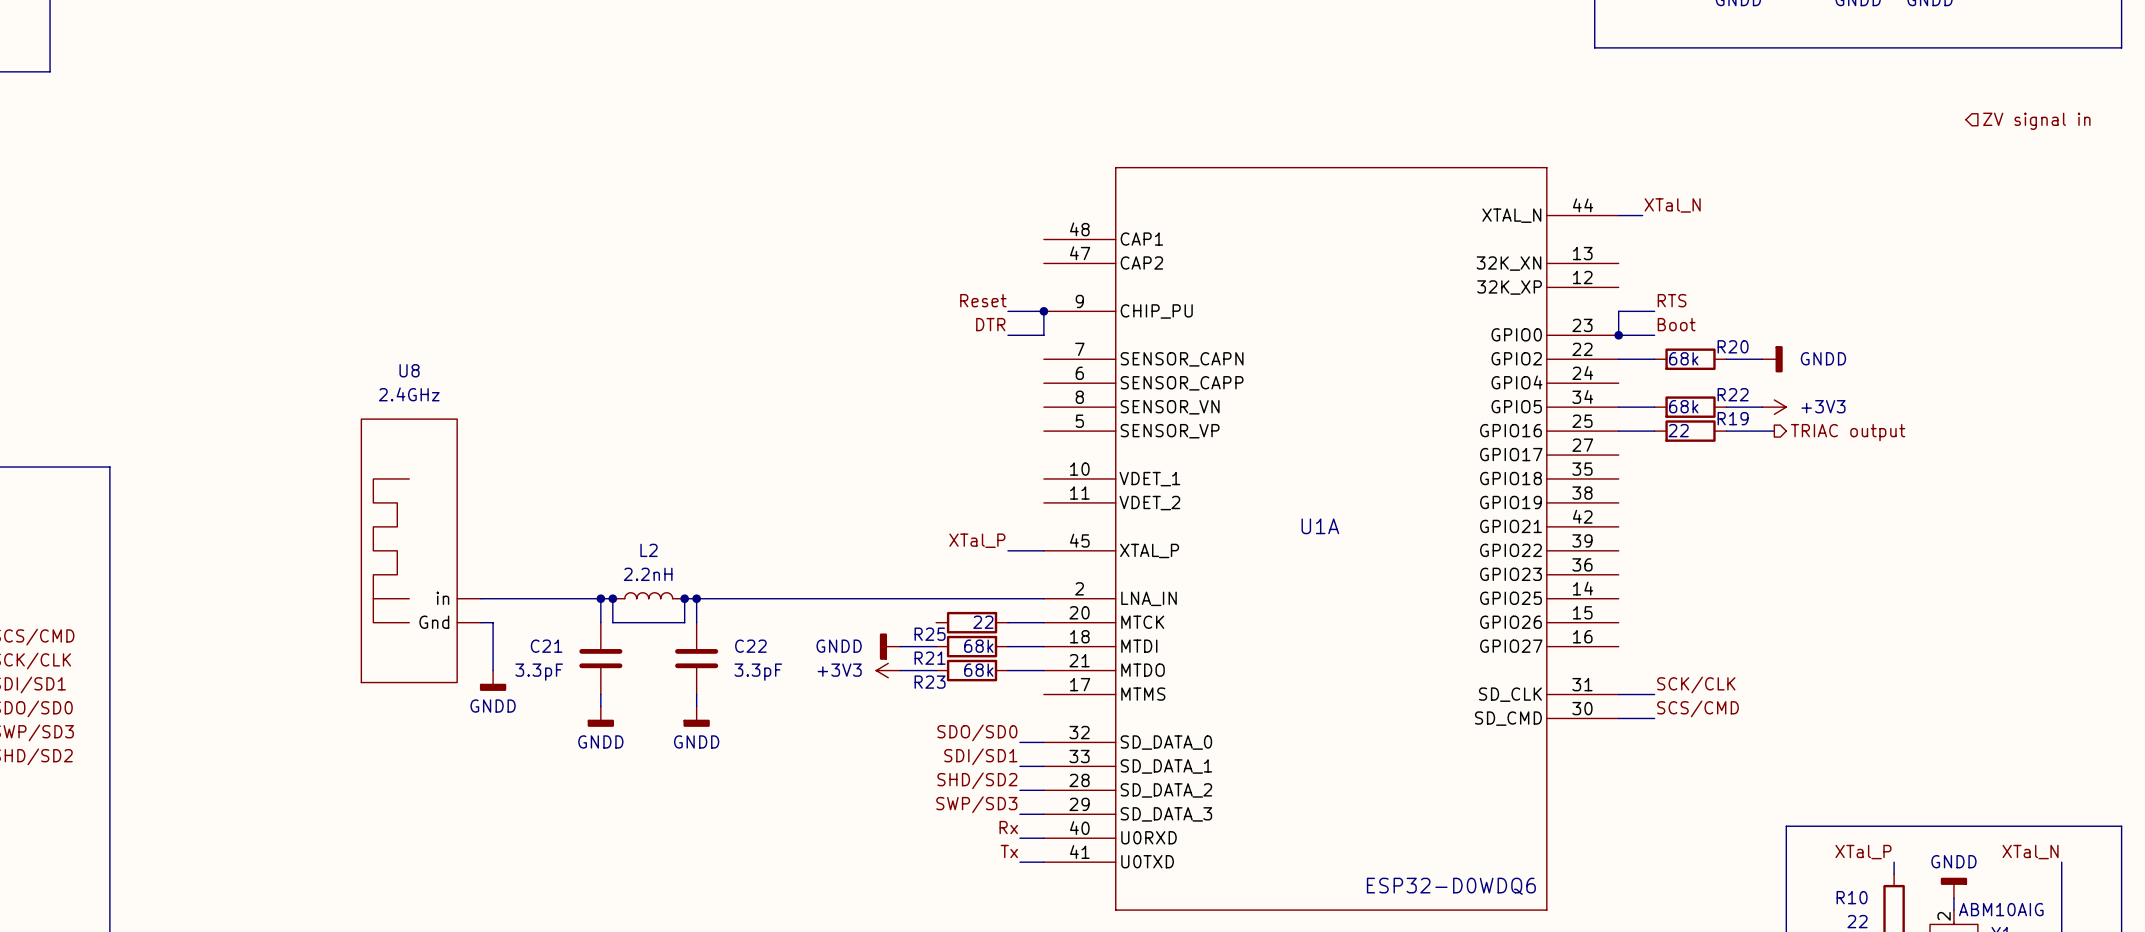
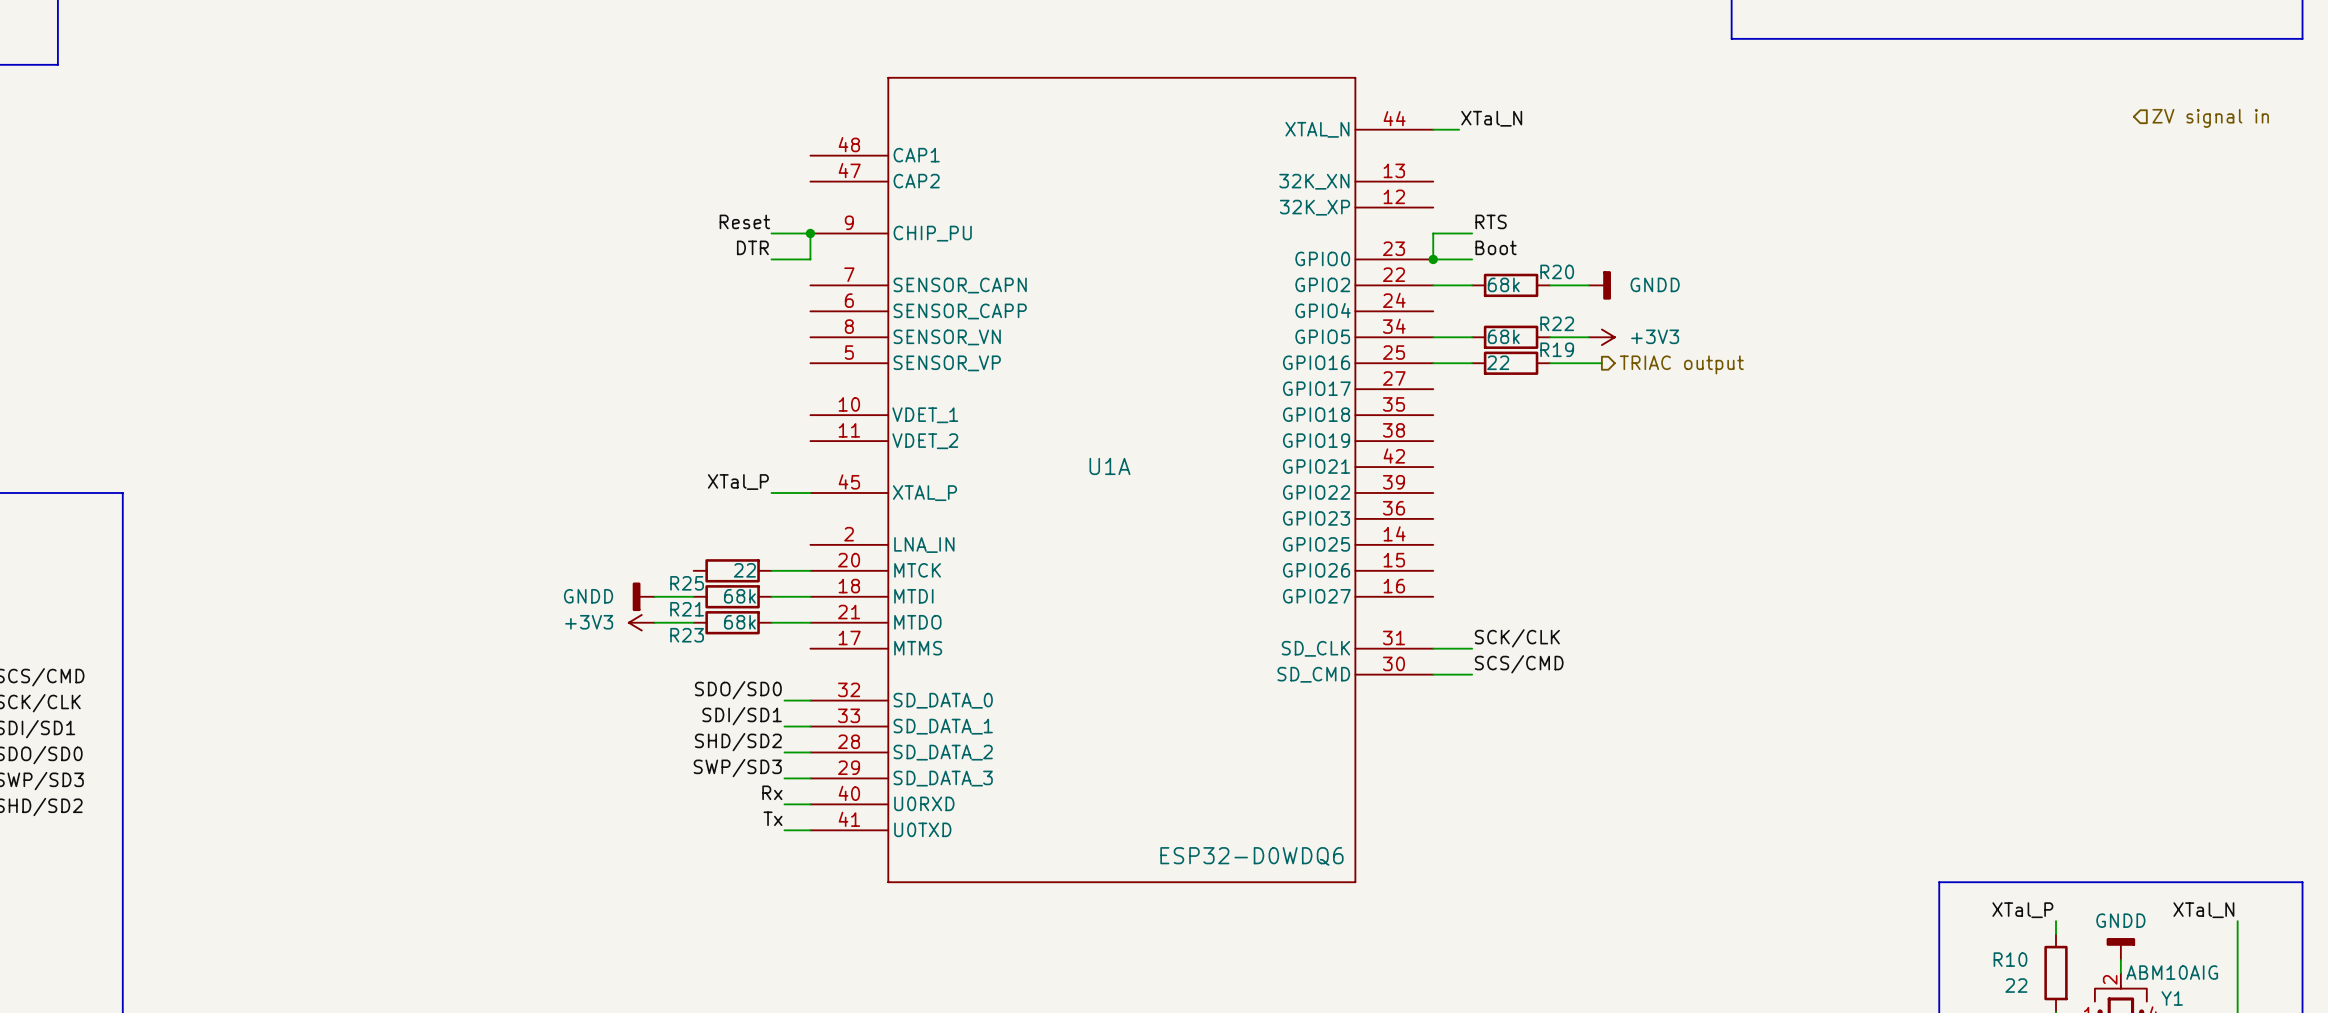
label: none -> XTal_N (1491, 118)
wire: none -> (1433, 129) (1459, 129)
label: XTal_N (1672, 205) -> none
wire: (1618, 215) (1642, 215) -> none
label: none -> Reset (744, 221)
label: none -> RTS (1491, 221)
wire: none -> (771, 233) (810, 233) (810, 259) (771, 259)
junction: none -> (810, 233)
wire: none -> (1472, 233) (1433, 233) (1433, 259) (1472, 259)
label: none -> DTR (752, 247)
label: none -> Boot (1496, 247)
junction: none -> (1433, 259)
wire: none -> (1433, 285) (1472, 285)
power symbol: none -> GNDD (1599, 285)
label: Reset (983, 300) -> none
label: RTS (1672, 300) -> none
wire: (1007, 311) (1043, 311) (1043, 335) (1007, 335) -> none
junction: (1043, 311) -> none
wire: (1654, 311) (1618, 311) (1618, 335) (1654, 335) -> none
wire: none -> (1433, 337) (1472, 337)
power symbol: none -> +3V3 (1601, 337)
label: DTR (990, 324) -> none
label: Boot (1676, 324) -> none
junction: (1618, 335) -> none
wire: none -> (1433, 363) (1472, 363)
wire: none -> (1549, 363) (1601, 363)
hierarchical label: none -> TRIAC output (1681, 364)
wire: (1618, 359) (1654, 359) -> (1549, 285) (1588, 285)
R20 position: (1690, 359) -> (1511, 285)
wire: (1726, 359) (1762, 359) -> none
power symbol: GNDD (1772, 359) -> none
wire: (1618, 407) (1654, 407) -> (1549, 337) (1588, 337)
R22 position: (1690, 407) -> (1511, 337)
wire: (1726, 407) (1762, 407) -> none
power symbol: +3V3 (1774, 407) -> none
wire: (1618, 431) (1654, 431) -> none
R19 position: (1690, 431) -> (1511, 363)
wire: (1726, 431) (1774, 431) -> none
hierarchical label: TRIAC output (1848, 432) -> none
label: none -> XTal_P (738, 482)
wire: none -> (771, 492) (810, 492)
wire: none -> (771, 570) (810, 570)
U1A position: (1331, 538) -> (1121, 480)
label: XTal_P (977, 540) -> none
U8: 2.4GHz (421, 550) -> none
wire: (1007, 550) (1043, 550) -> none
power symbol: none -> GNDD (643, 596)
wire: none -> (654, 596) (693, 596)
power symbol: none -> +3V3 (641, 622)
wire: none -> (654, 622) (693, 622)
L2: 2.2nH (648, 595) -> none
wire: (481, 598) (612, 598) (612, 622) (684, 622) (684, 598) (1043, 598) -> none
wire: (600, 598) (600, 622) -> none
junction: (600, 598) -> none
junction: (612, 598) -> none
junction: (684, 598) -> none
wire: (696, 598) (696, 622) -> none
junction: (696, 598) -> none
label: none -> SCK/CLK (1517, 638)
wire: none -> (1433, 648) (1472, 648)
wire: (481, 622) (493, 622) (493, 670) -> none
R25 position: (972, 622) -> (732, 570)
wire: (1007, 622) (1043, 622) -> none
label: none -> SCS/CMD (1519, 664)
wire: none -> (1433, 674) (1472, 674)
power symbol: GNDD (890, 646) -> none
wire: (900, 646) (936, 646) -> (771, 596) (810, 596)
R21 position: (972, 646) -> (732, 596)
wire: (1007, 646) (1043, 646) -> none
label: none -> SDO/SD0 (738, 690)
C21: 3.3pF (600, 658) -> none
C22: 3.3pF (696, 658) -> none
wire: none -> (784, 700) (810, 700)
power symbol: +3V3 (888, 670) -> none
wire: (900, 670) (936, 670) -> (771, 622) (810, 622)
R23 position: (972, 670) -> (732, 622)
wire: (1007, 670) (1043, 670) -> none
label: none -> SDI/SD1 (742, 716)
power symbol: GNDD (493, 680) -> none
wire: none -> (784, 726) (810, 726)
label: SCK/CLK (1696, 684) -> none
wire: (600, 694) (600, 706) -> none
wire: (696, 694) (696, 706) -> none
wire: (1618, 694) (1654, 694) -> none
label: none -> SHD/SD2 (738, 742)
wire: none -> (784, 752) (810, 752)
label: SCS/CMD (1698, 708) -> none
power symbol: GNDD (600, 716) -> none
power symbol: GNDD (696, 716) -> none
wire: (1618, 718) (1654, 718) -> none
label: none -> SWP/SD3 (737, 768)
wire: none -> (784, 778) (810, 778)
label: SDO/SD0 (977, 732) -> none
wire: (1019, 742) (1043, 742) -> none
label: none -> Rx (772, 792)
wire: none -> (784, 804) (810, 804)
label: SDI/SD1 (980, 756) -> none
wire: (1019, 766) (1043, 766) -> none
label: none -> Tx (772, 818)
wire: none -> (784, 830) (810, 830)
label: SHD/SD2 (977, 780) -> none
wire: (1019, 790) (1043, 790) -> none
label: SWP/SD3 (976, 804) -> none
wire: (1019, 814) (1043, 814) -> none
label: Rx (1008, 827) -> none
wire: (1019, 838) (1043, 838) -> none
label: Tx (1009, 851) -> none
wire: (1019, 862) (1043, 862) -> none

